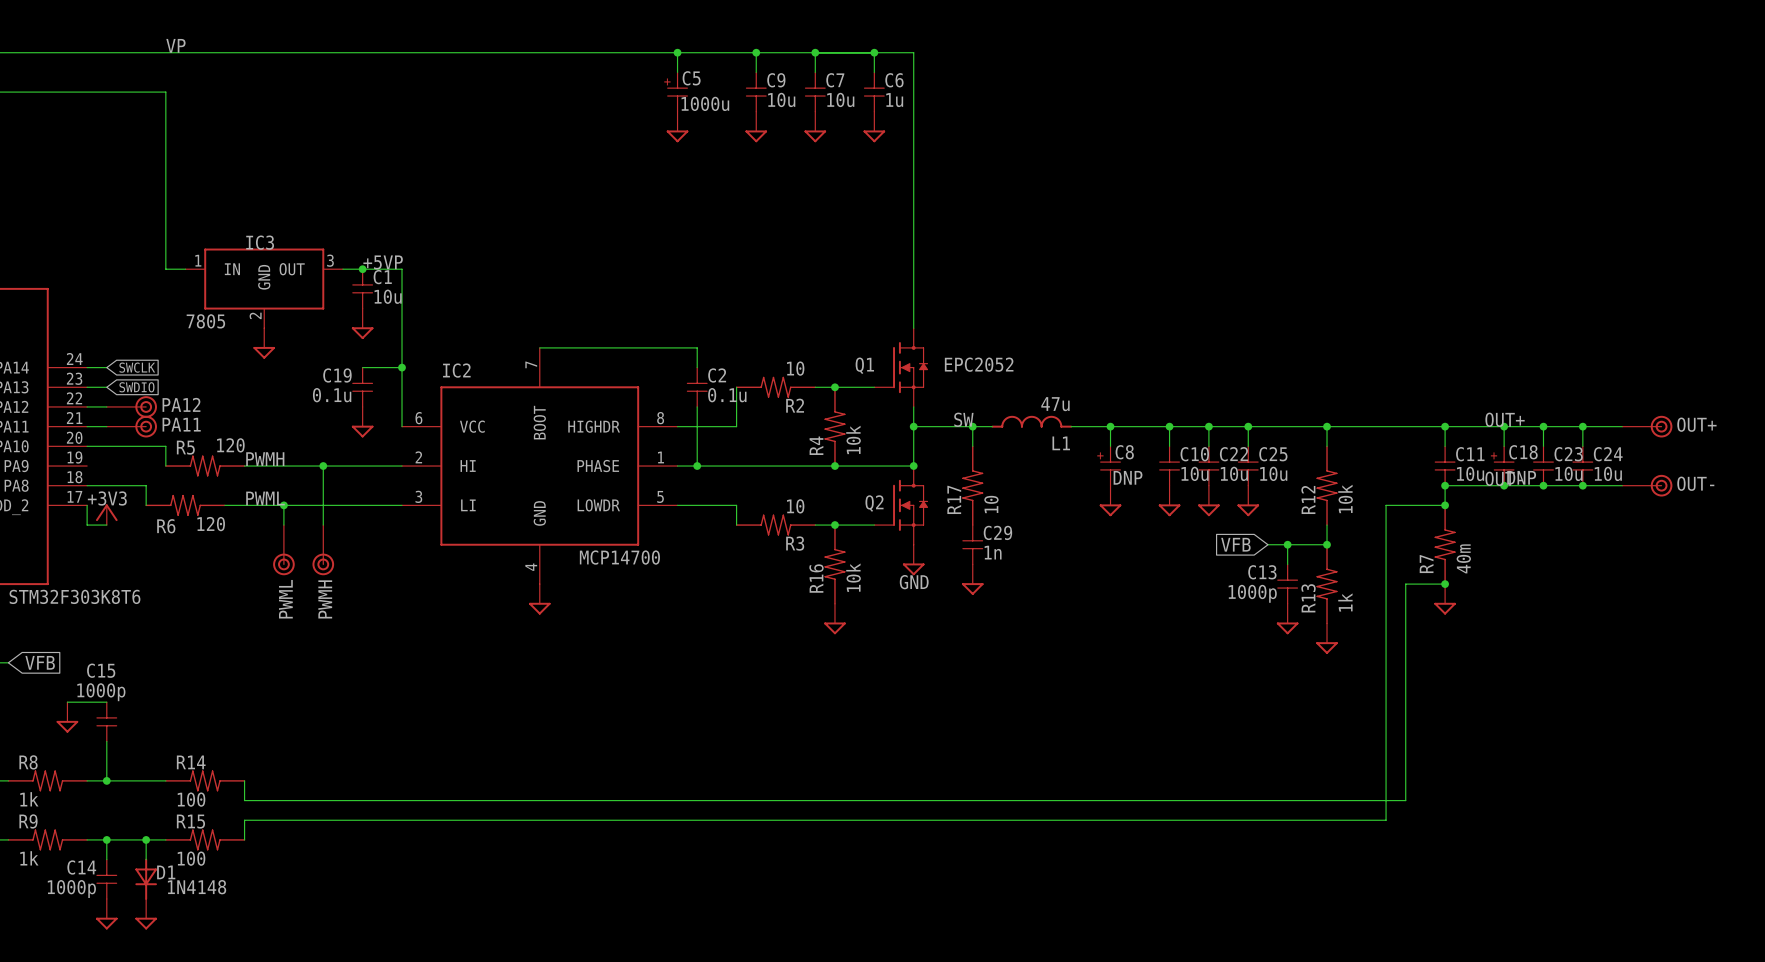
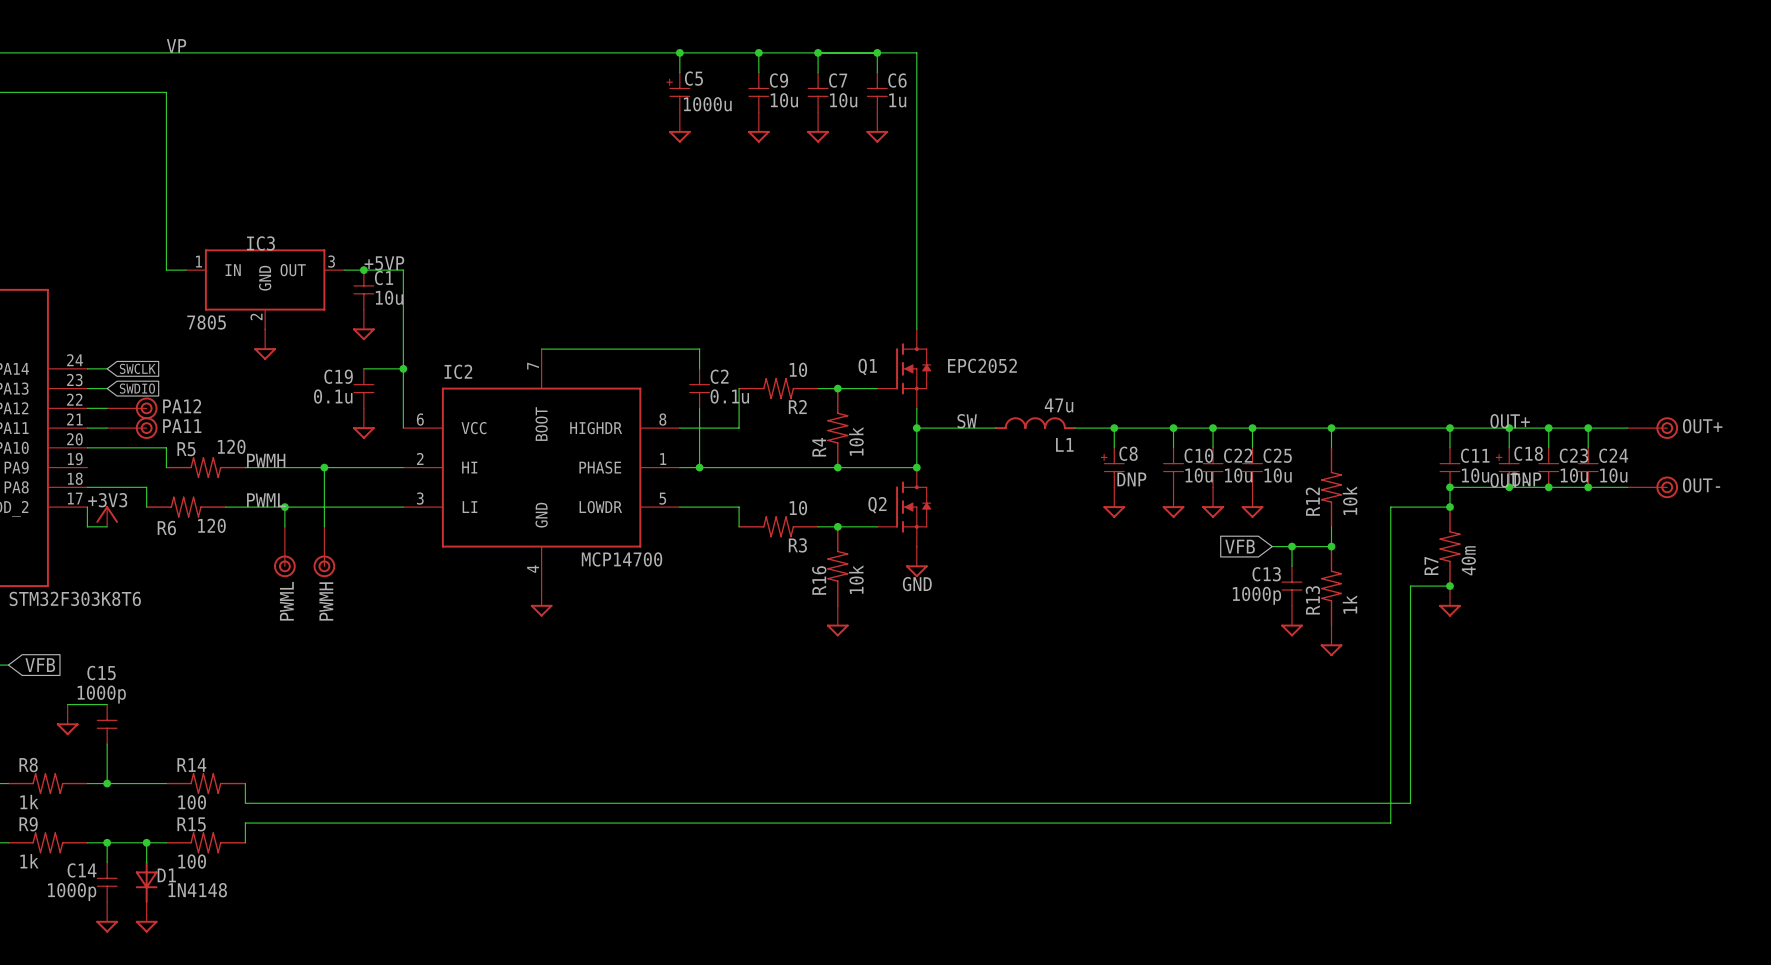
wire: (972, 426) (972, 446) -> none
junction: (972, 426) -> none
R17: 10 (972, 485) -> none
C29: 1n (972, 544) -> none
power symbol: (972, 579) -> none

